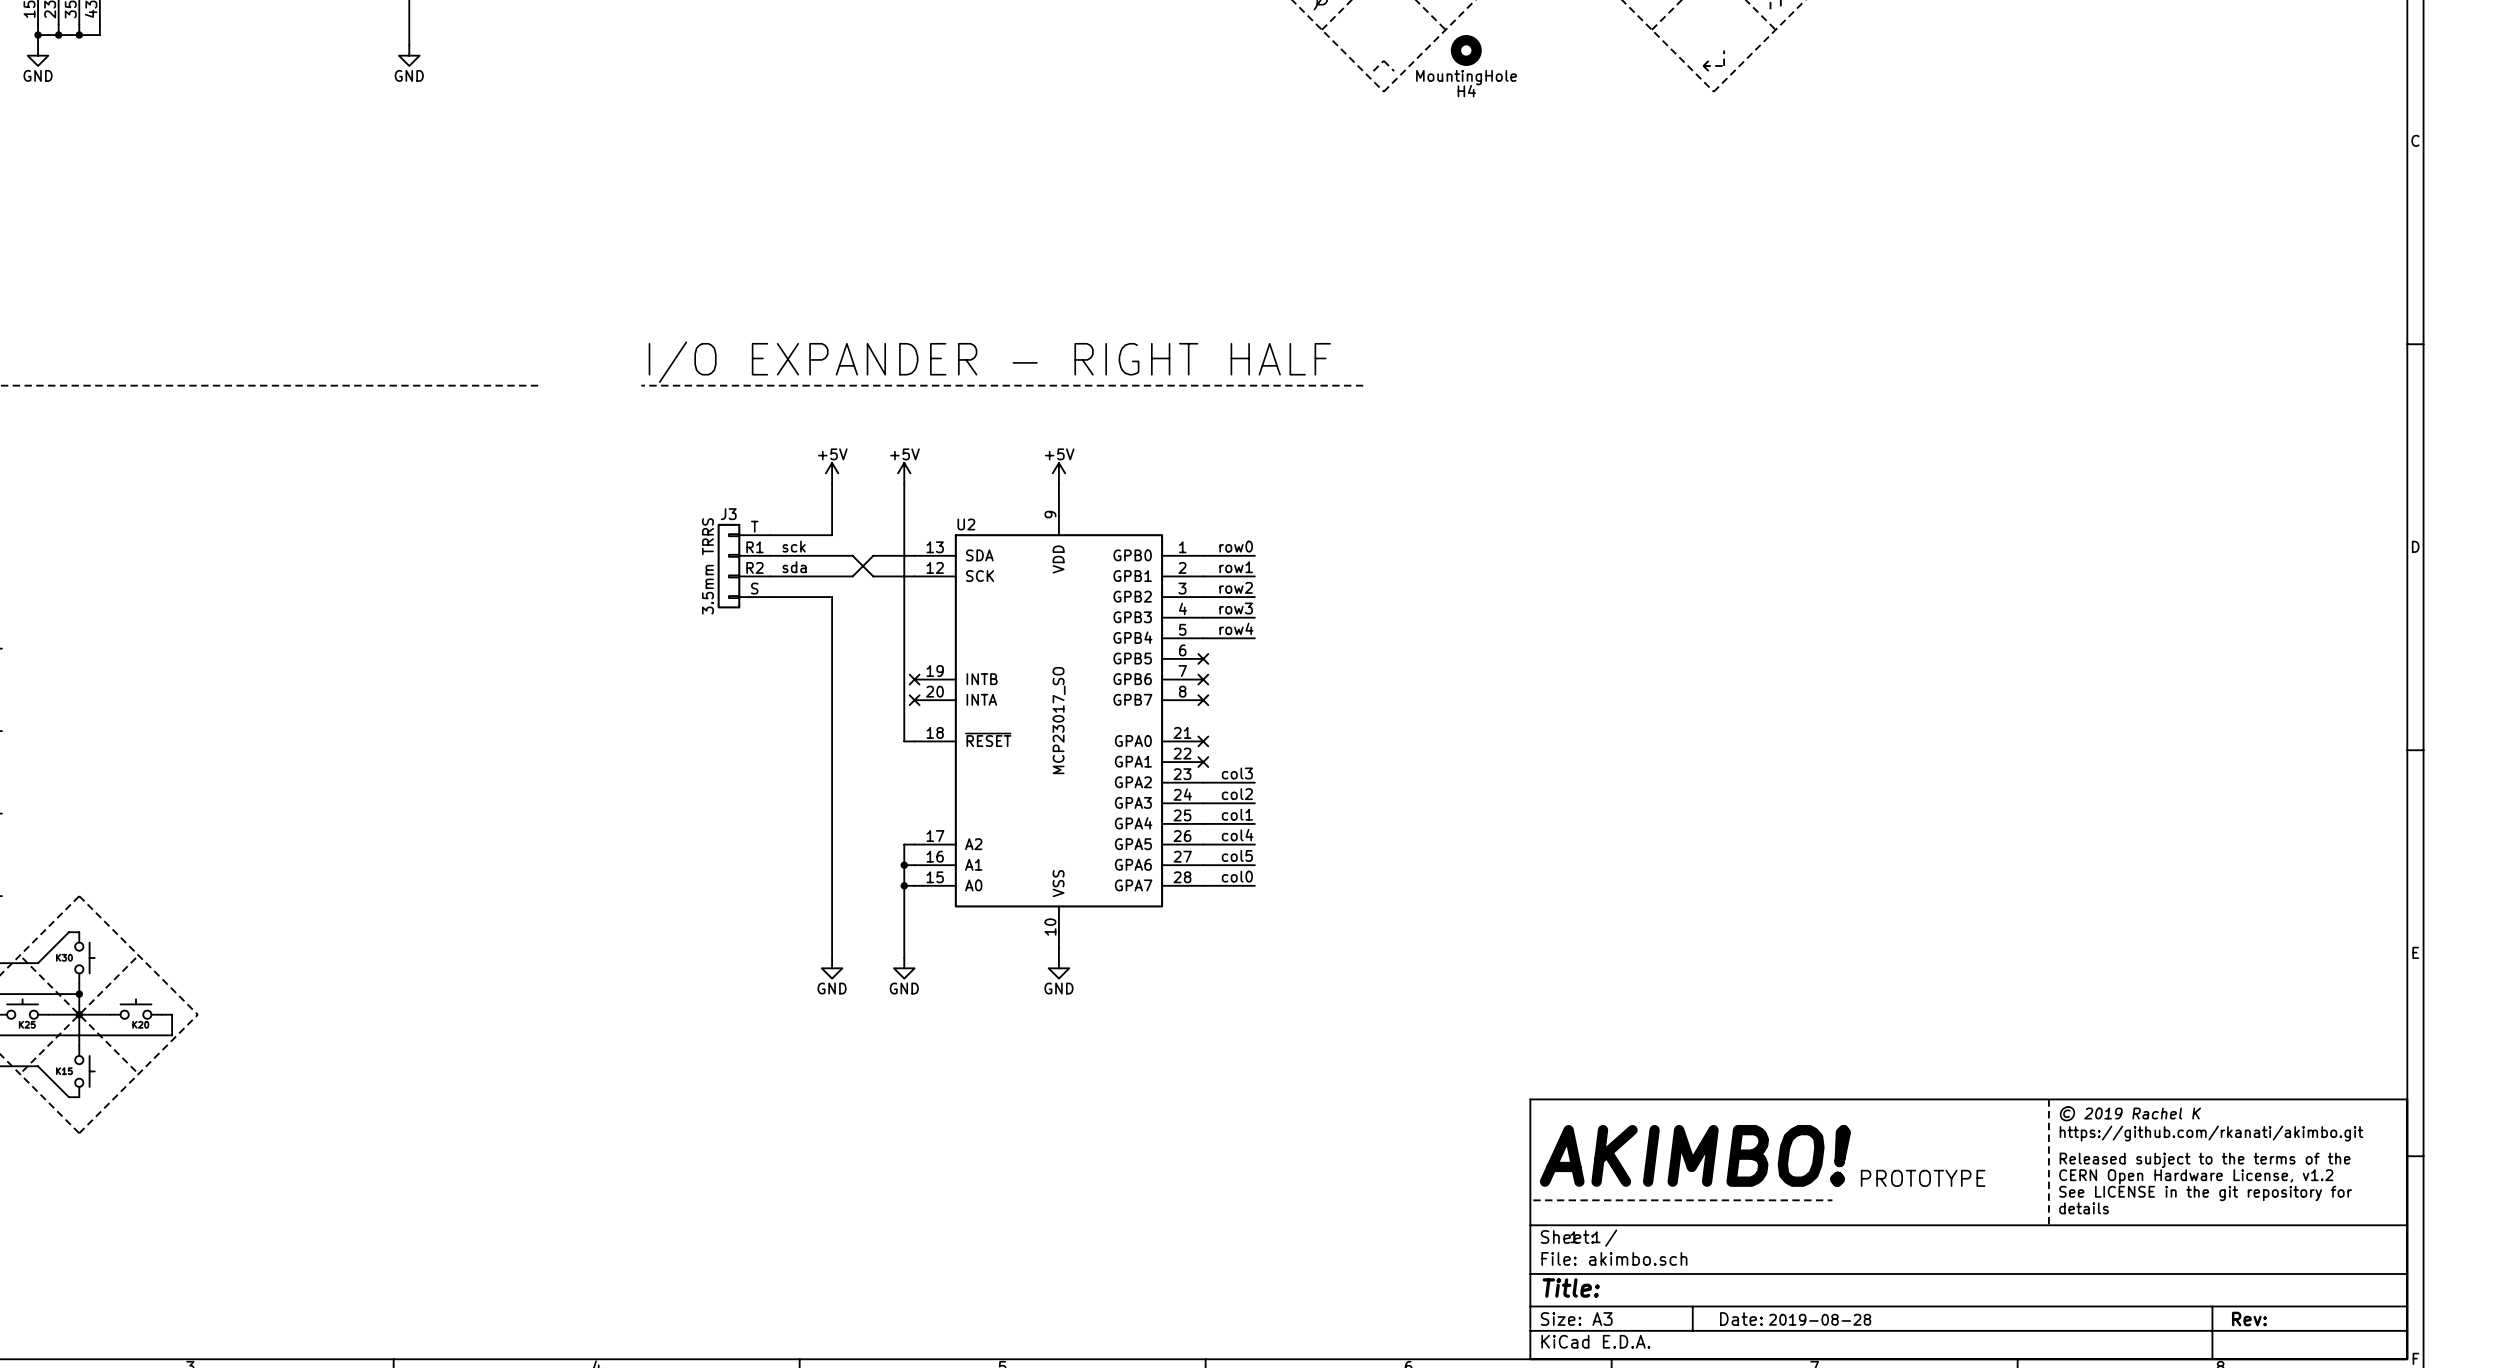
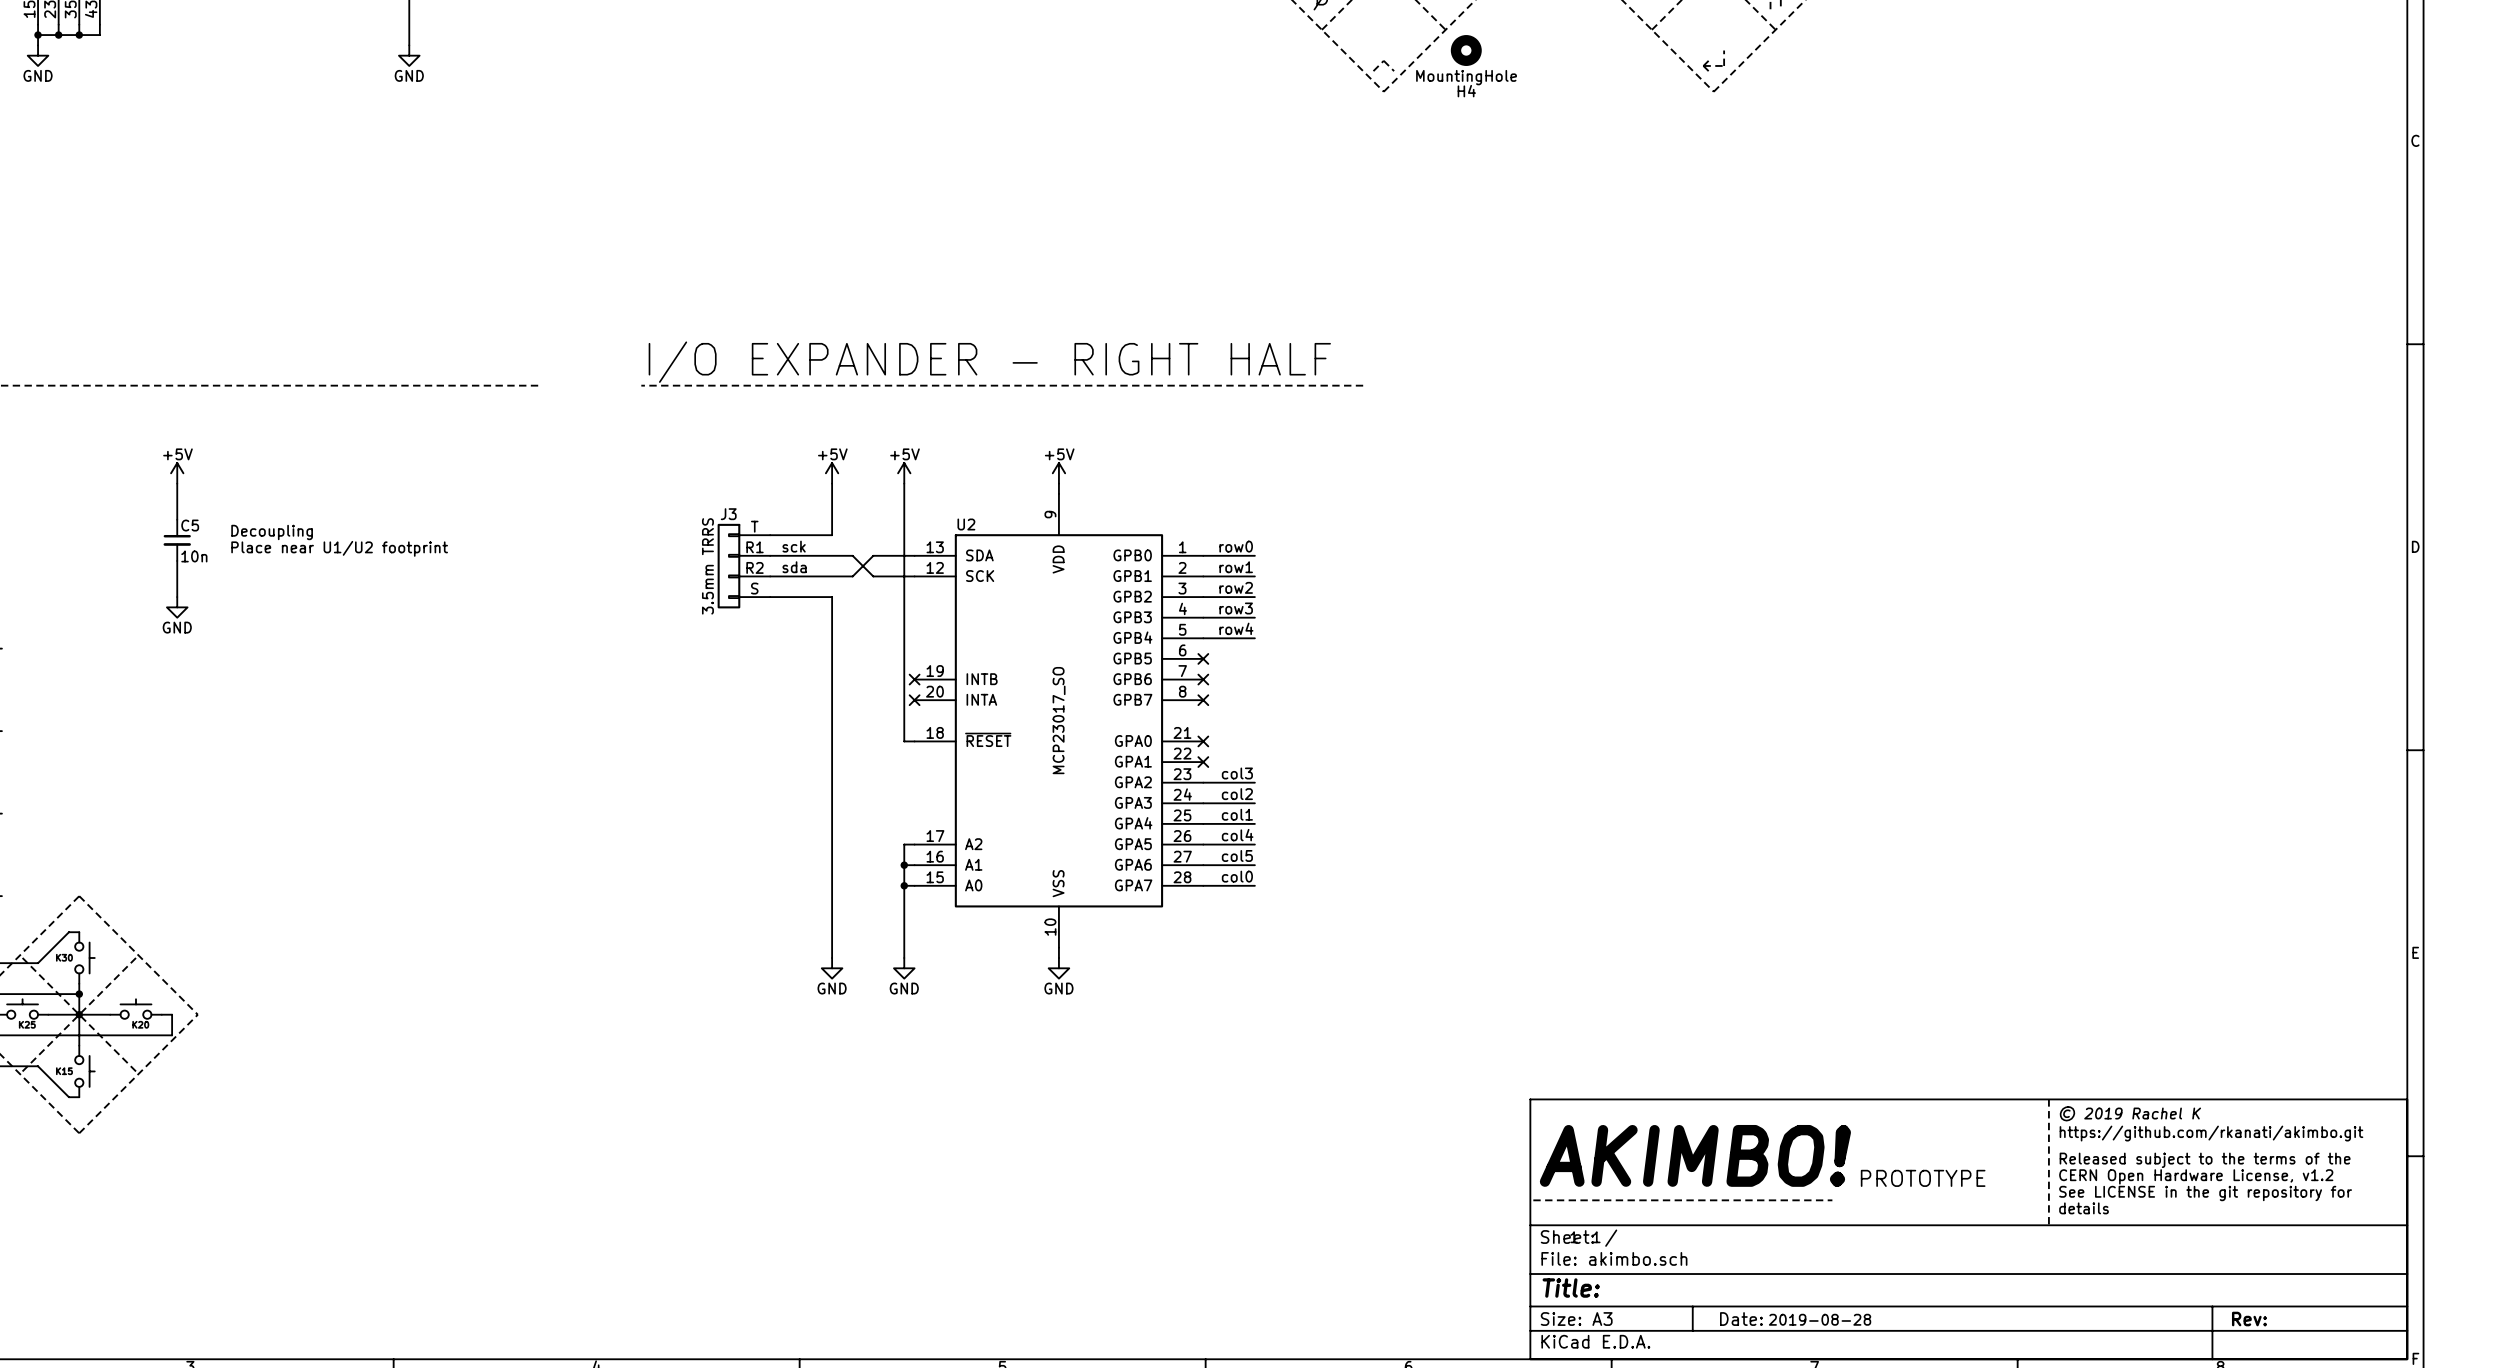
power symbol: none -> +5V (177, 473)
wire: none -> (177, 483) (177, 519)
text: none -> Decoupling (272, 532)
C5: none -> 10n (177, 540)
text: none -> Place near U1/U2 footprint (339, 548)
wire: none -> (177, 560) (177, 597)
power symbol: none -> GND (177, 607)

